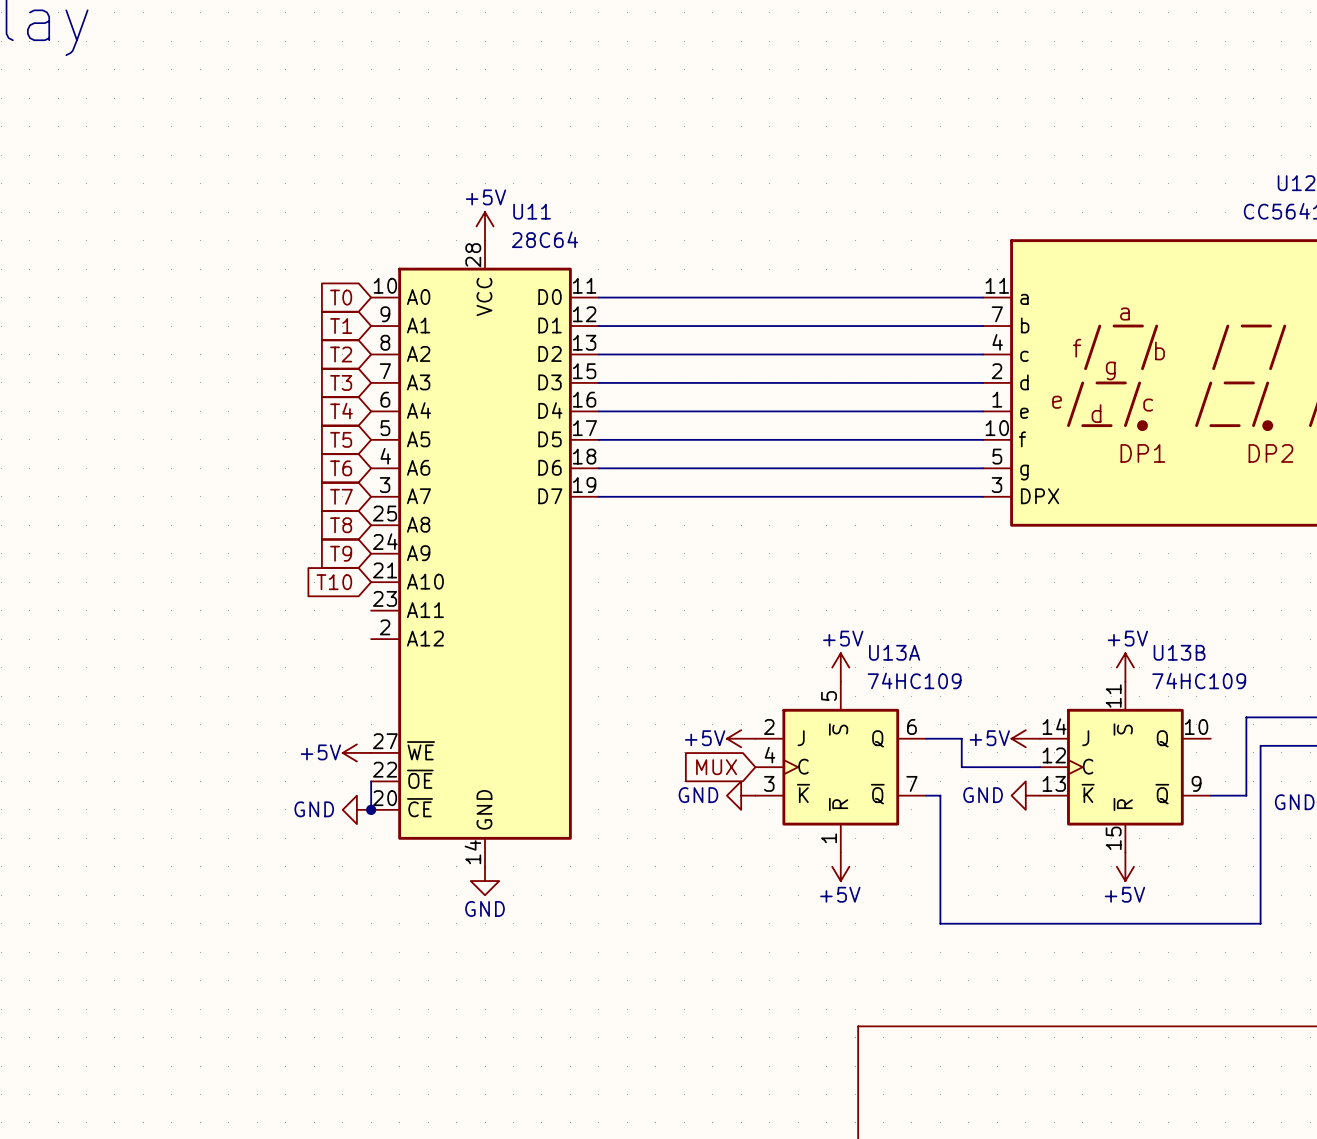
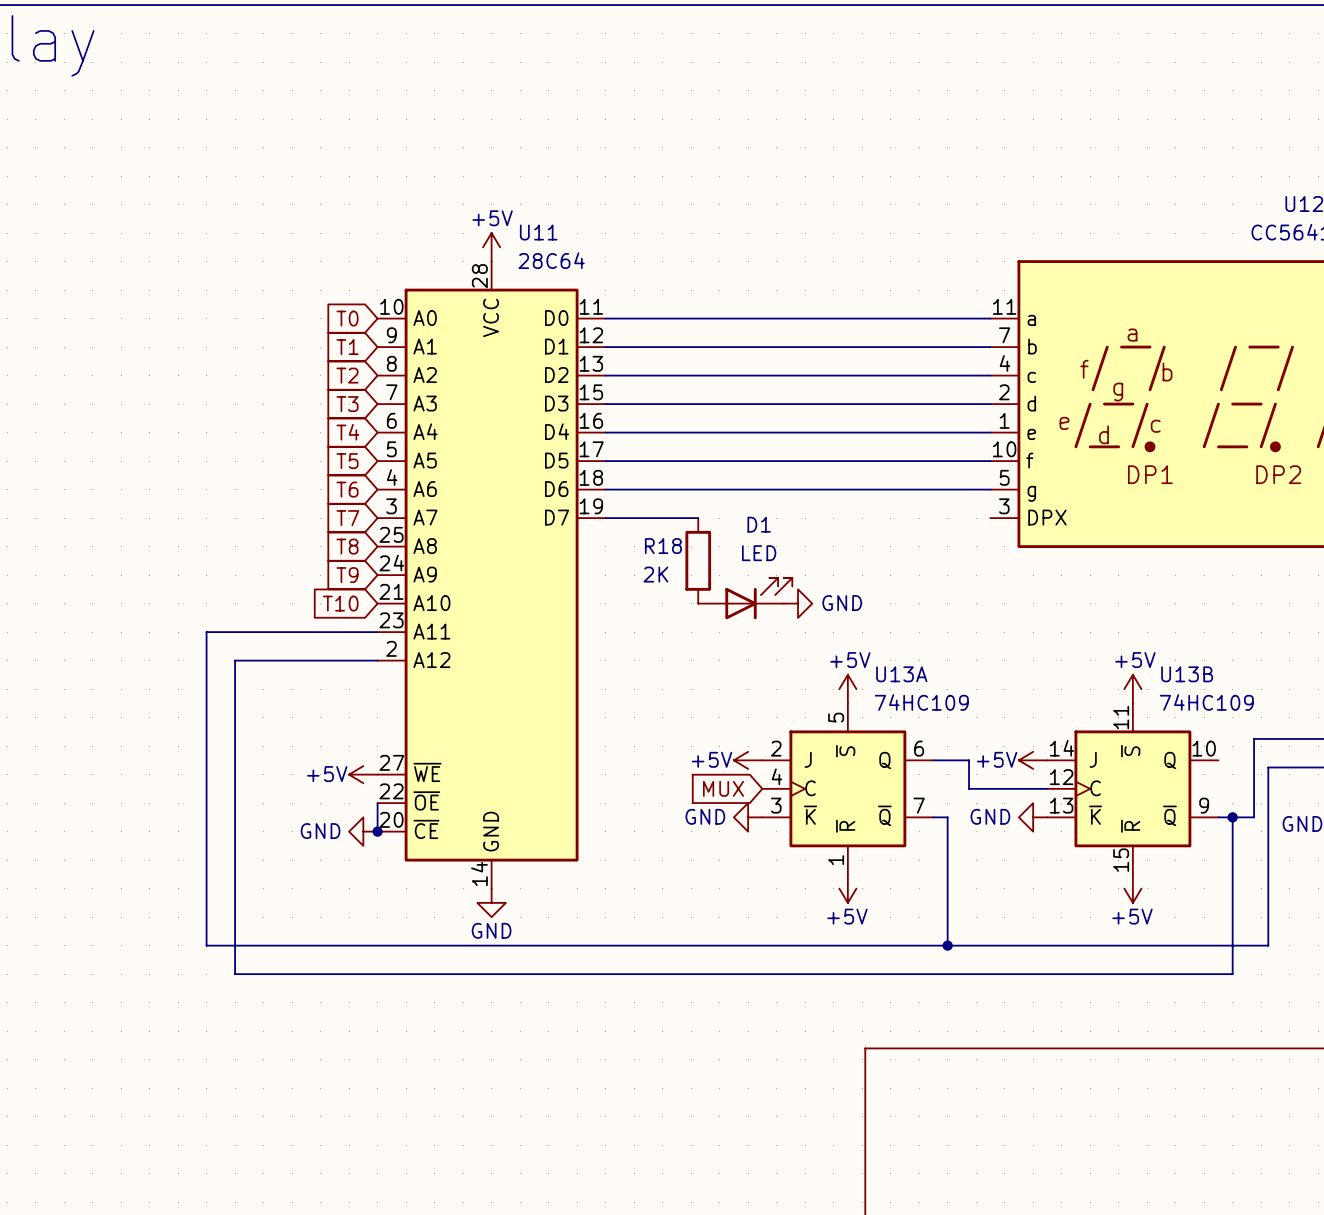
wire: (691, 496) (983, 496) -> none
R18: none -> 2K (698, 560)
D1: none -> LED (745, 598)
power symbol: none -> GND (798, 603)
wire: none -> (377, 632) (206, 632) (206, 945) (947, 945)
wire: none -> (377, 660) (235, 660) (235, 974) (1232, 974) (1232, 817)
junction: none -> (1232, 817)
junction: none -> (947, 945)

